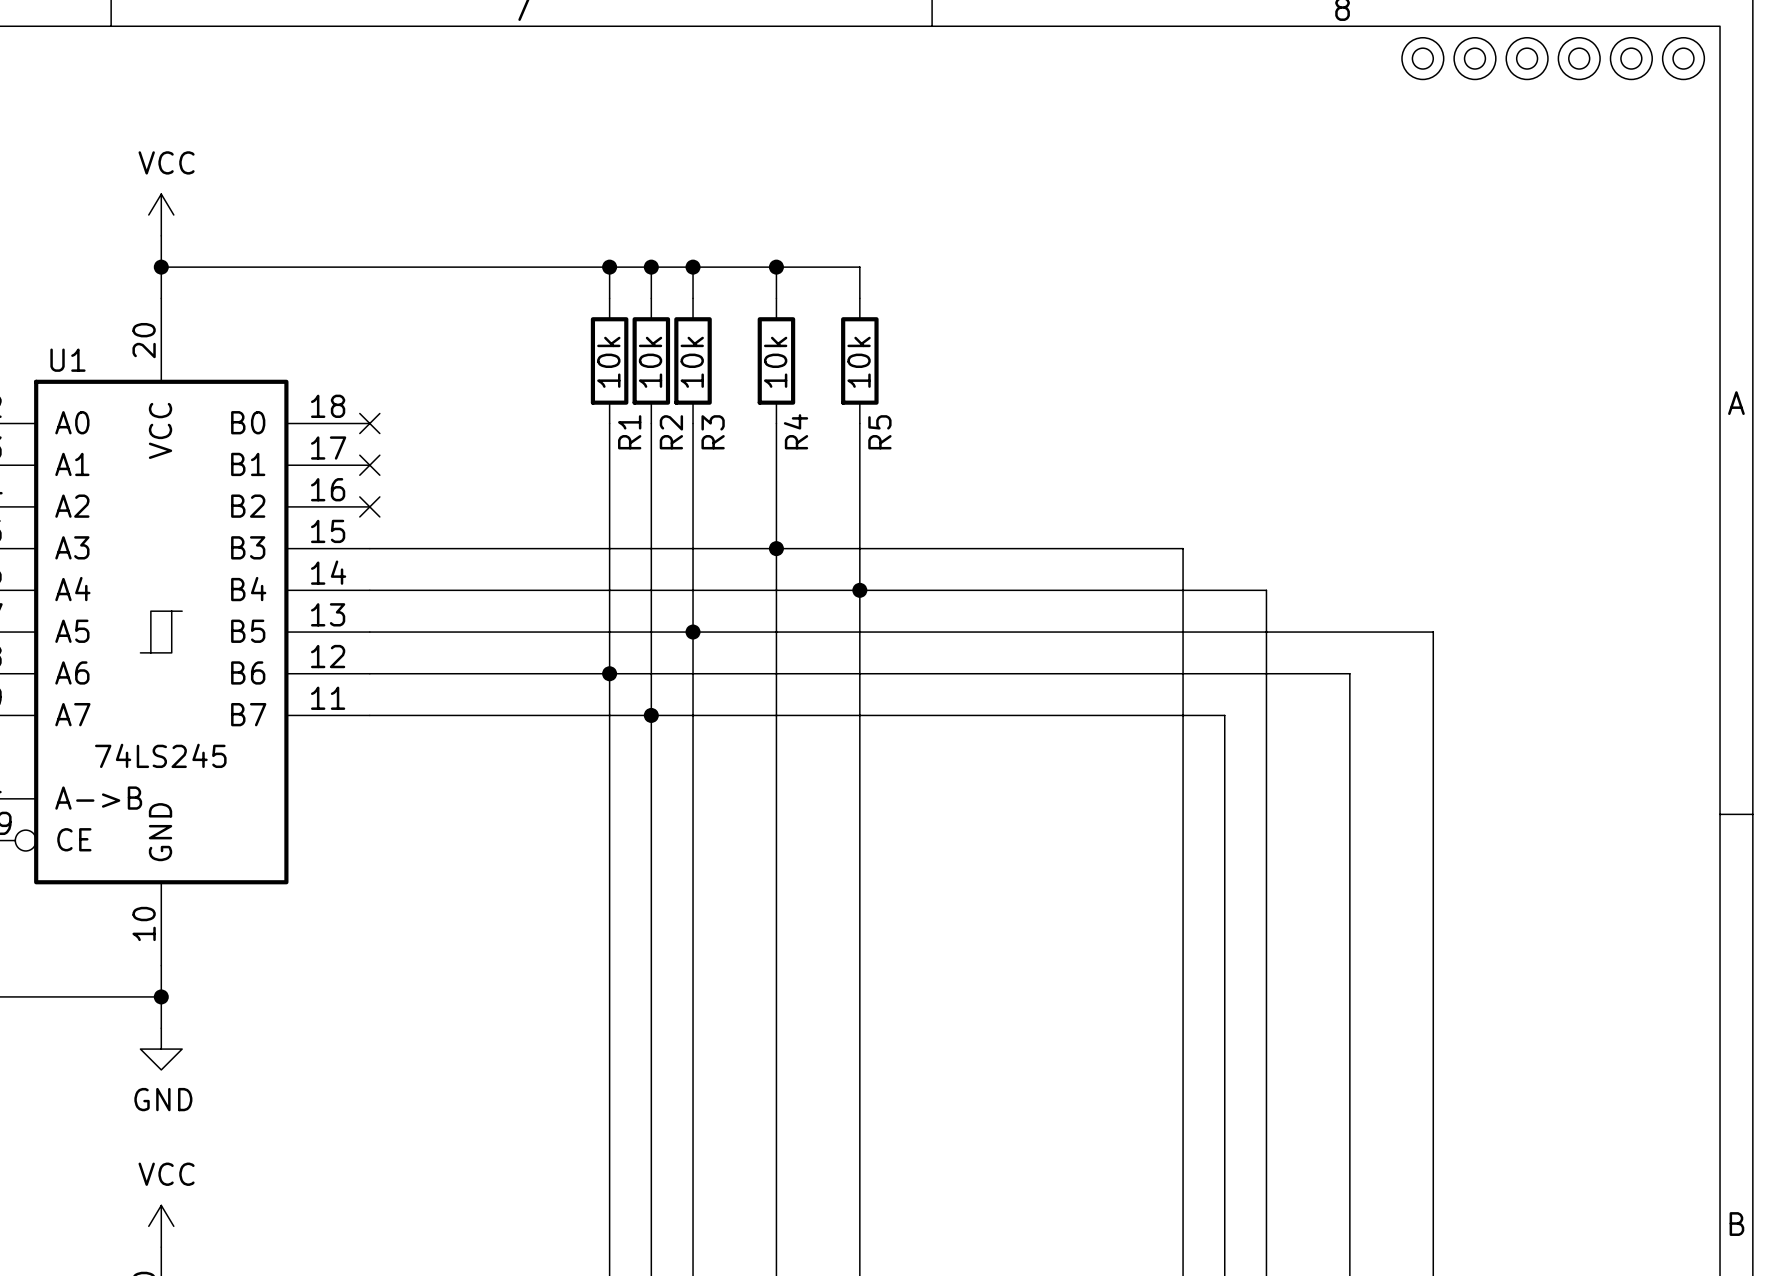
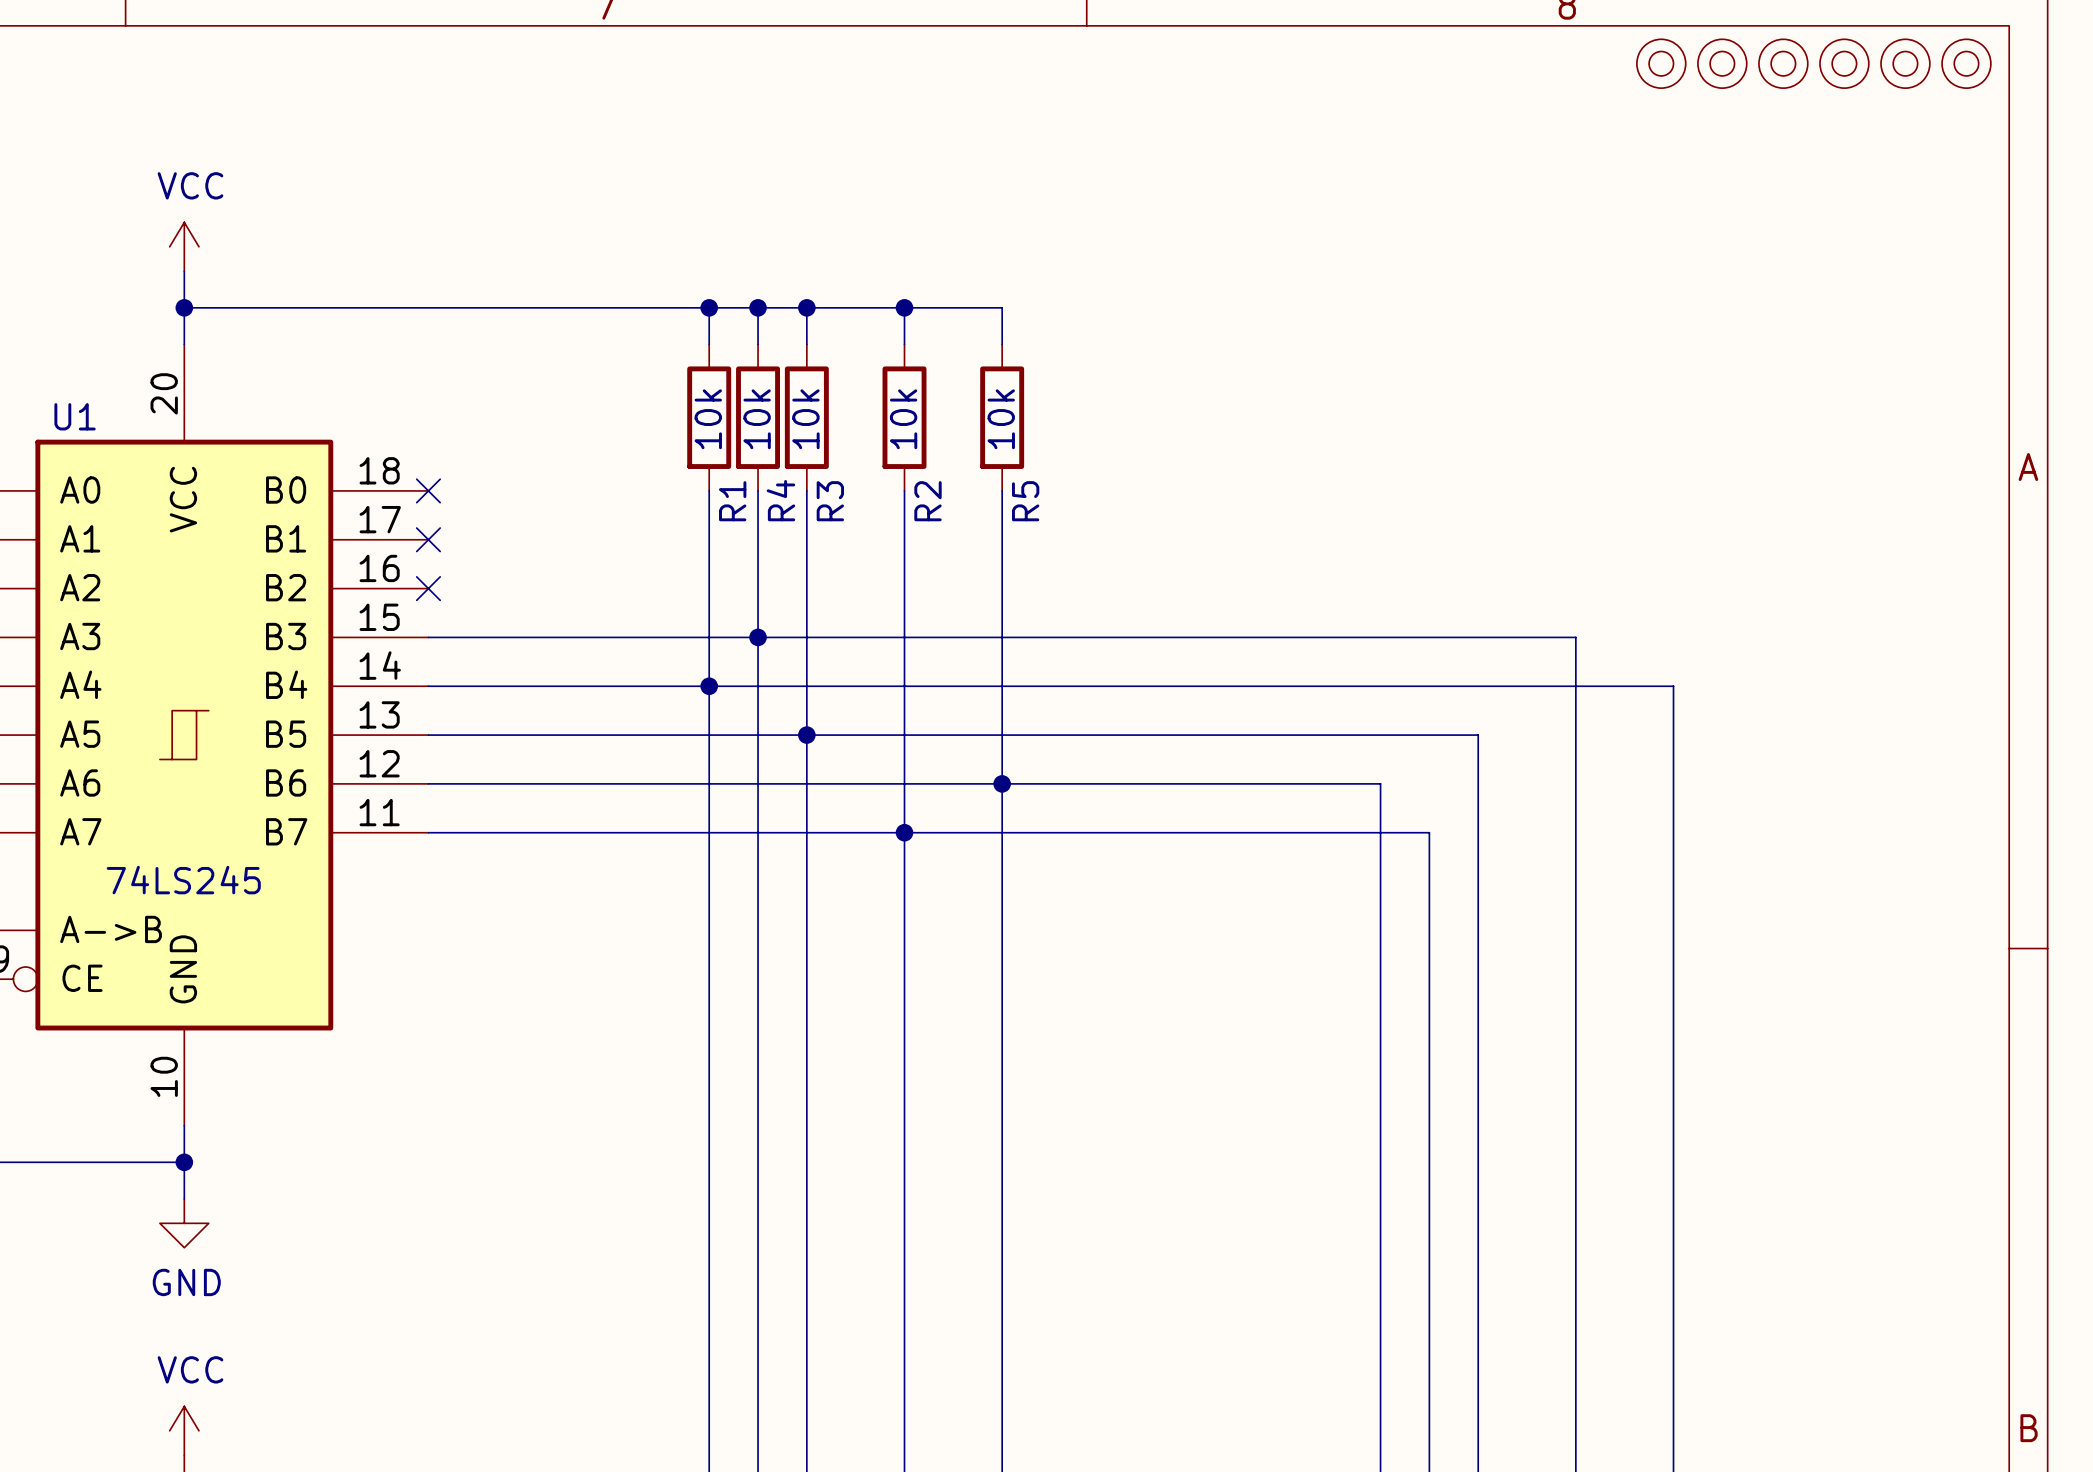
R4 name: R4 (796, 431) -> R2 (928, 501)
R2 name: R2 (671, 432) -> R4 (780, 500)
junction: none -> (758, 637)
junction: (776, 548) -> none
wire: (1183, 548) (1183, 673) (1349, 673) -> (1380, 637) (1575, 637) (1575, 783)
junction: none -> (709, 686)
junction: (859, 590) -> none
wire: (1266, 590) (1266, 632) (1433, 632) -> (1478, 686) (1673, 686) (1673, 735)
junction: (609, 673) -> none
junction: none -> (1002, 783)
junction: (651, 715) -> none
junction: none -> (904, 832)

